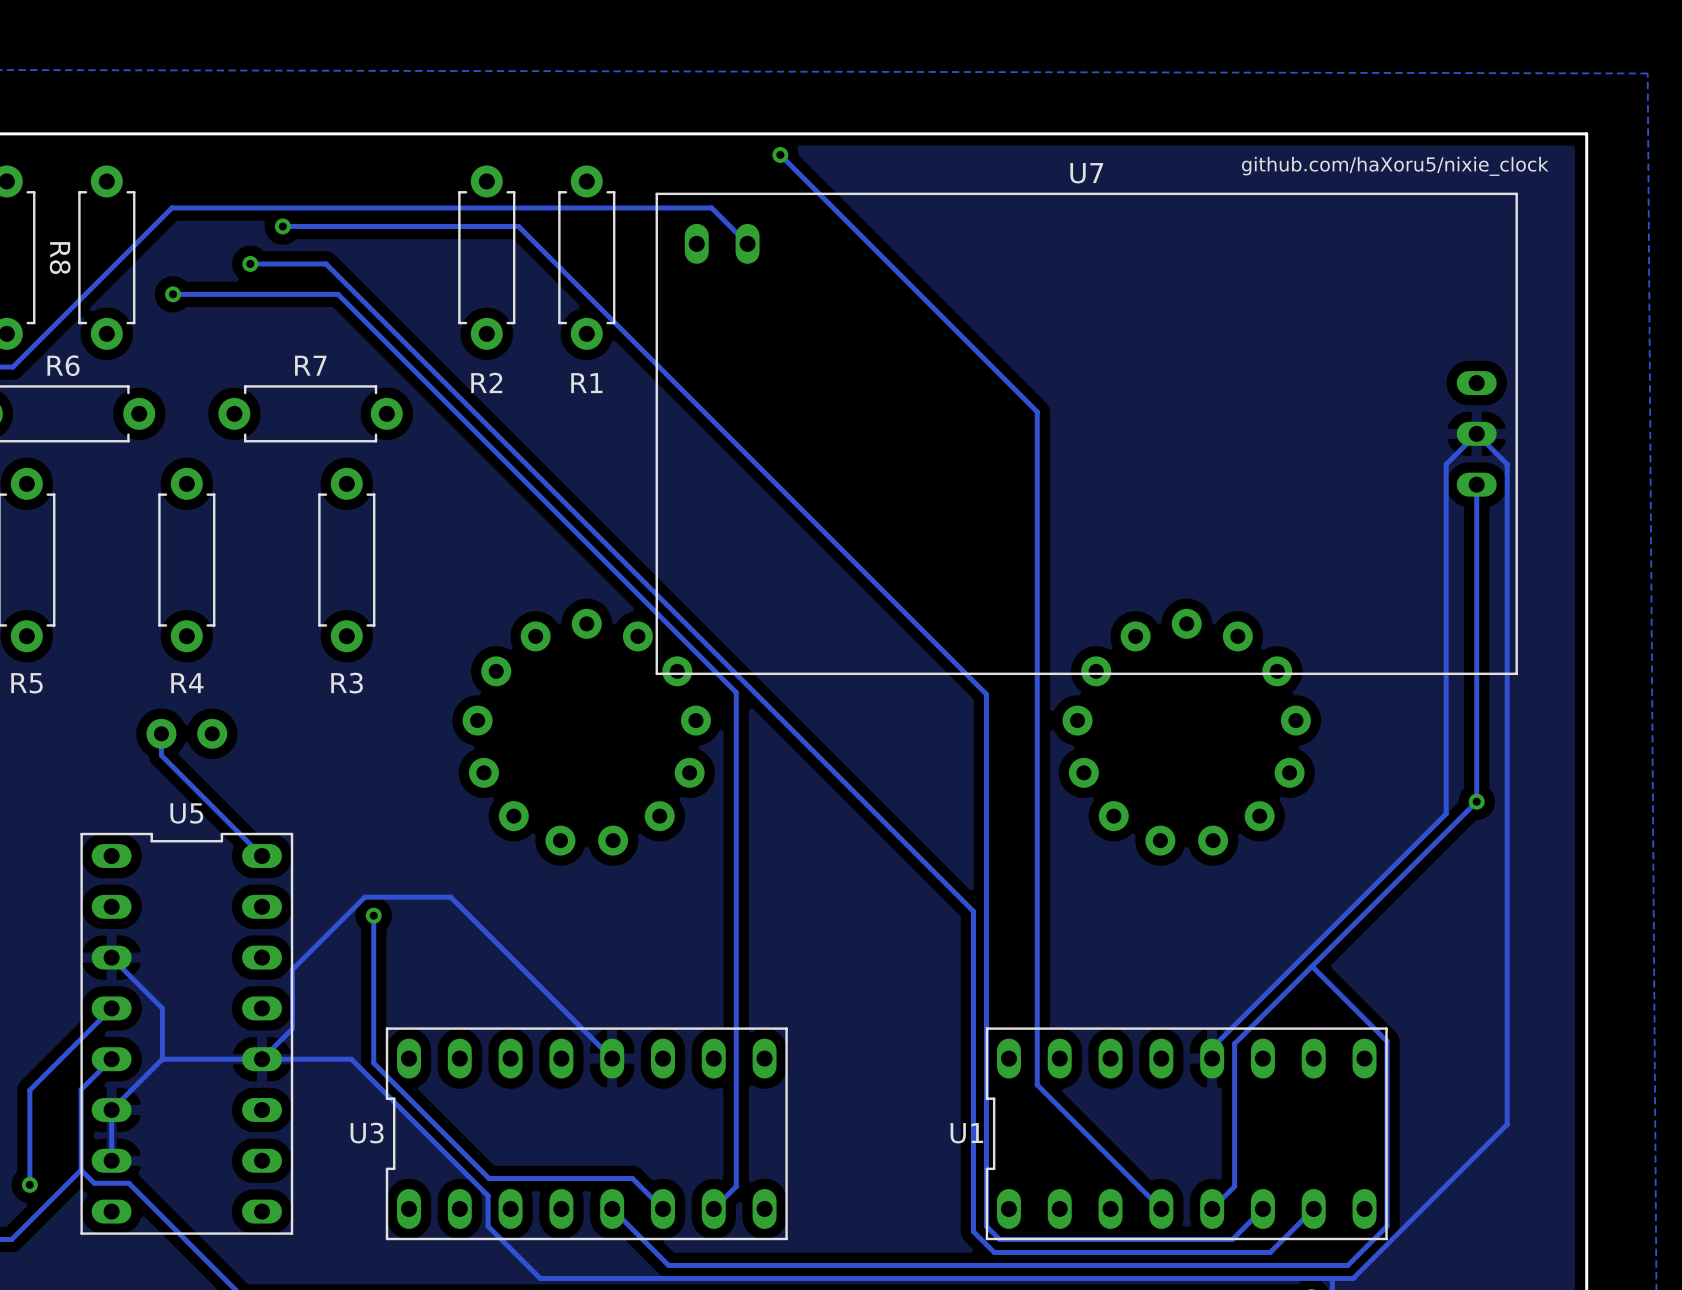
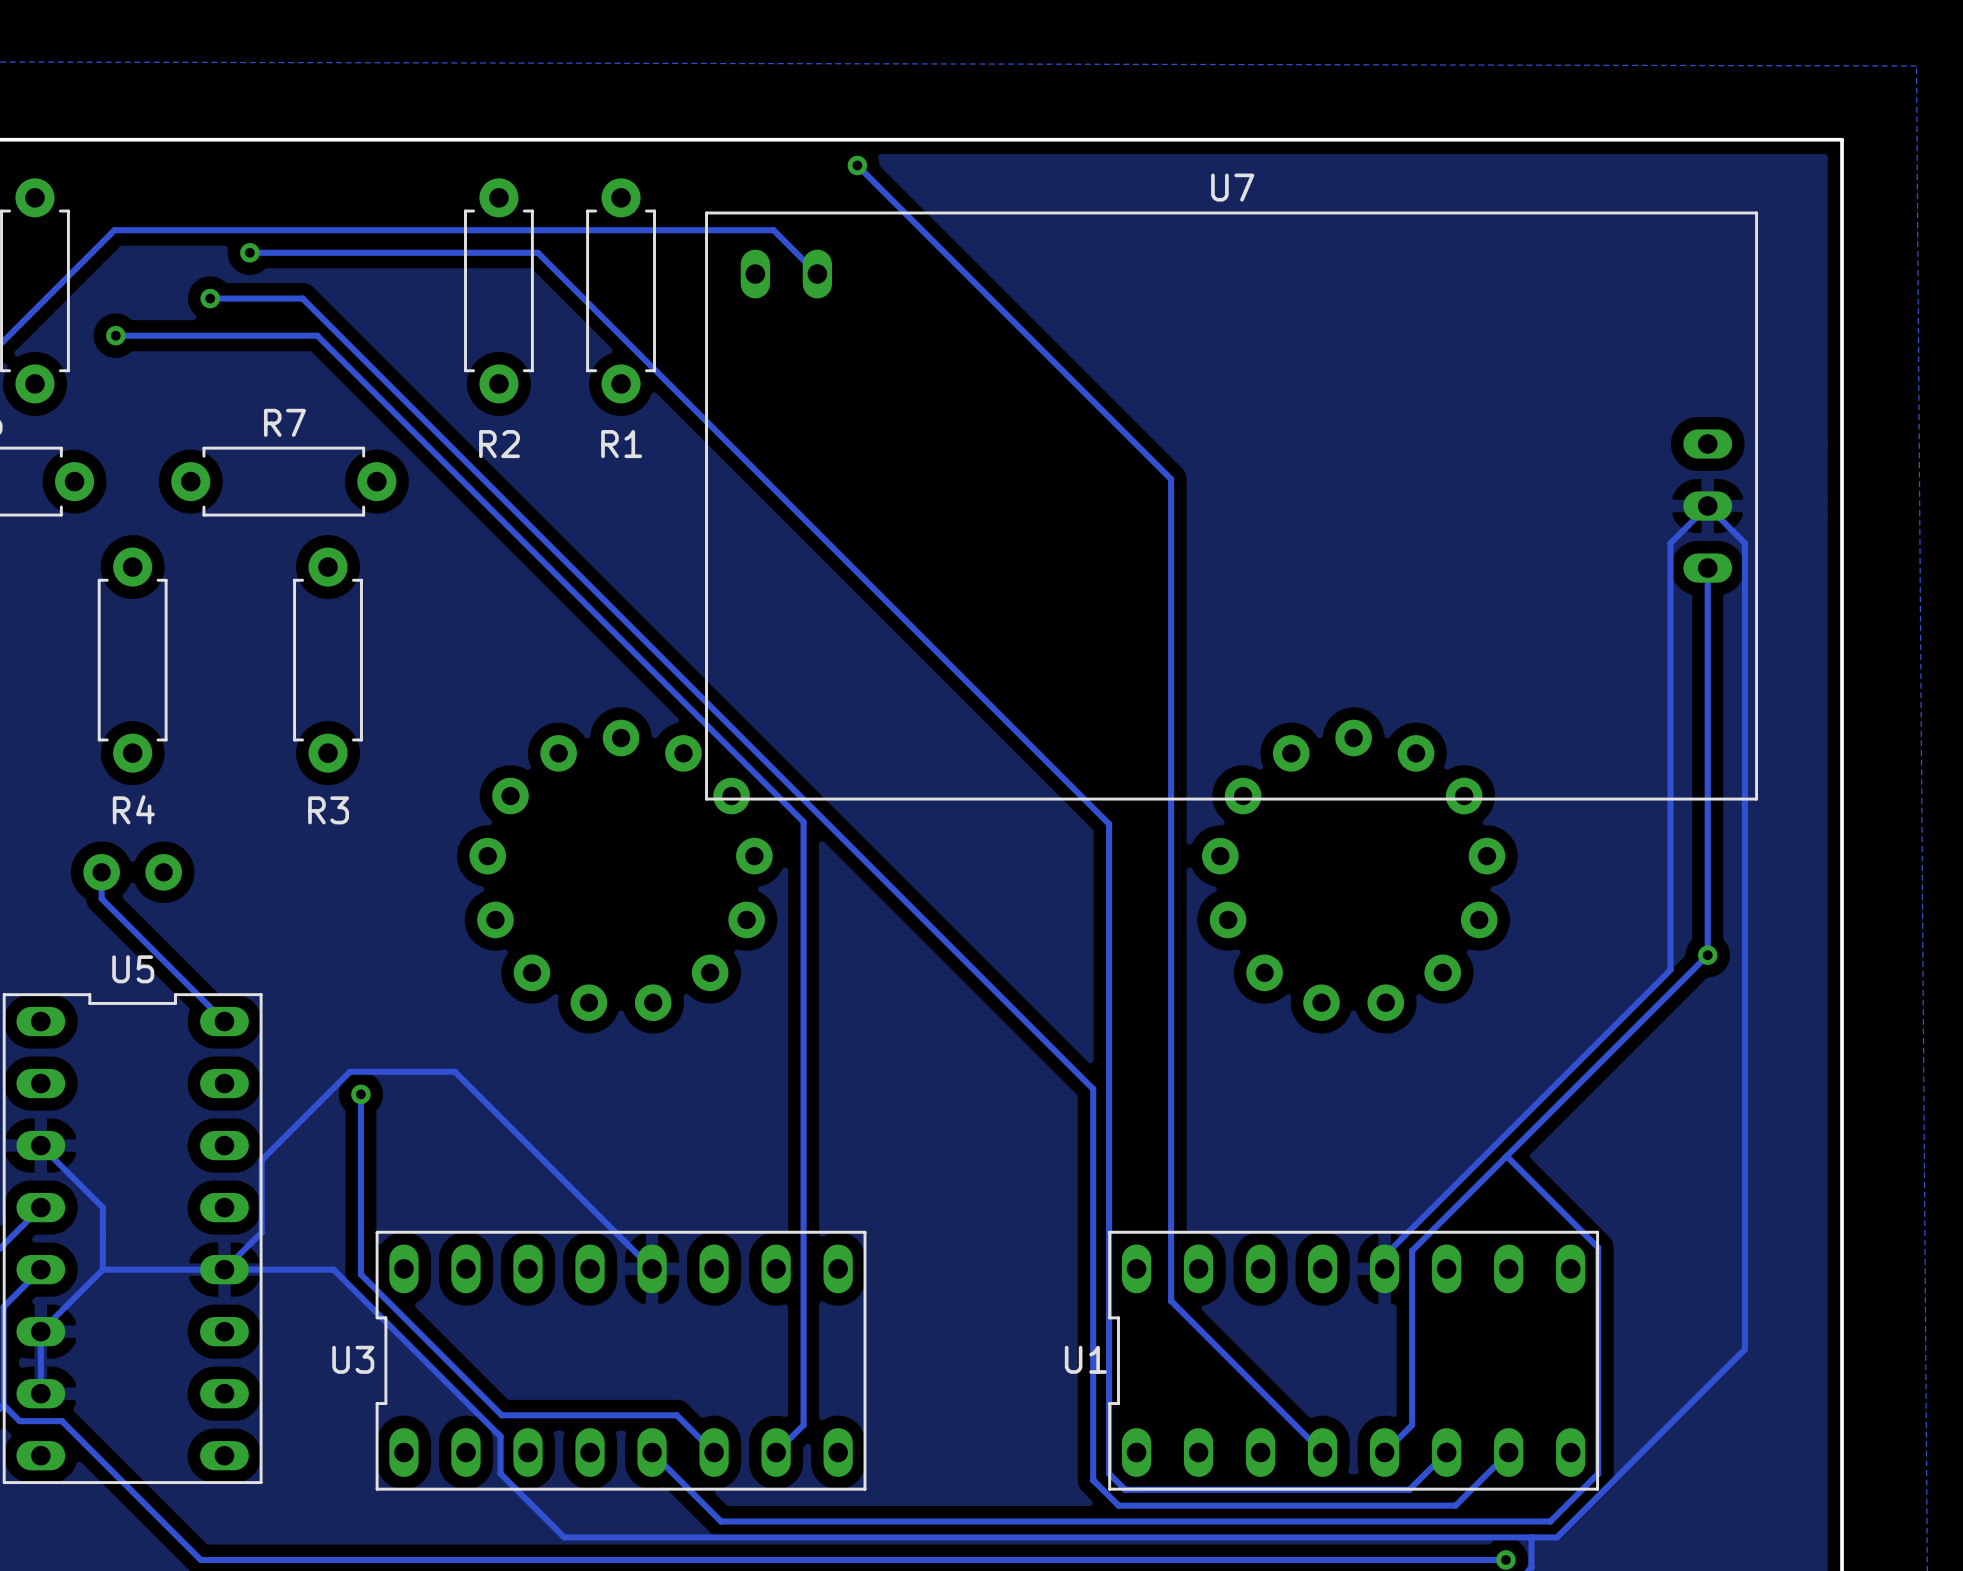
text: github.com/haXoru5/nixie_clock (1395, 166) -> none

